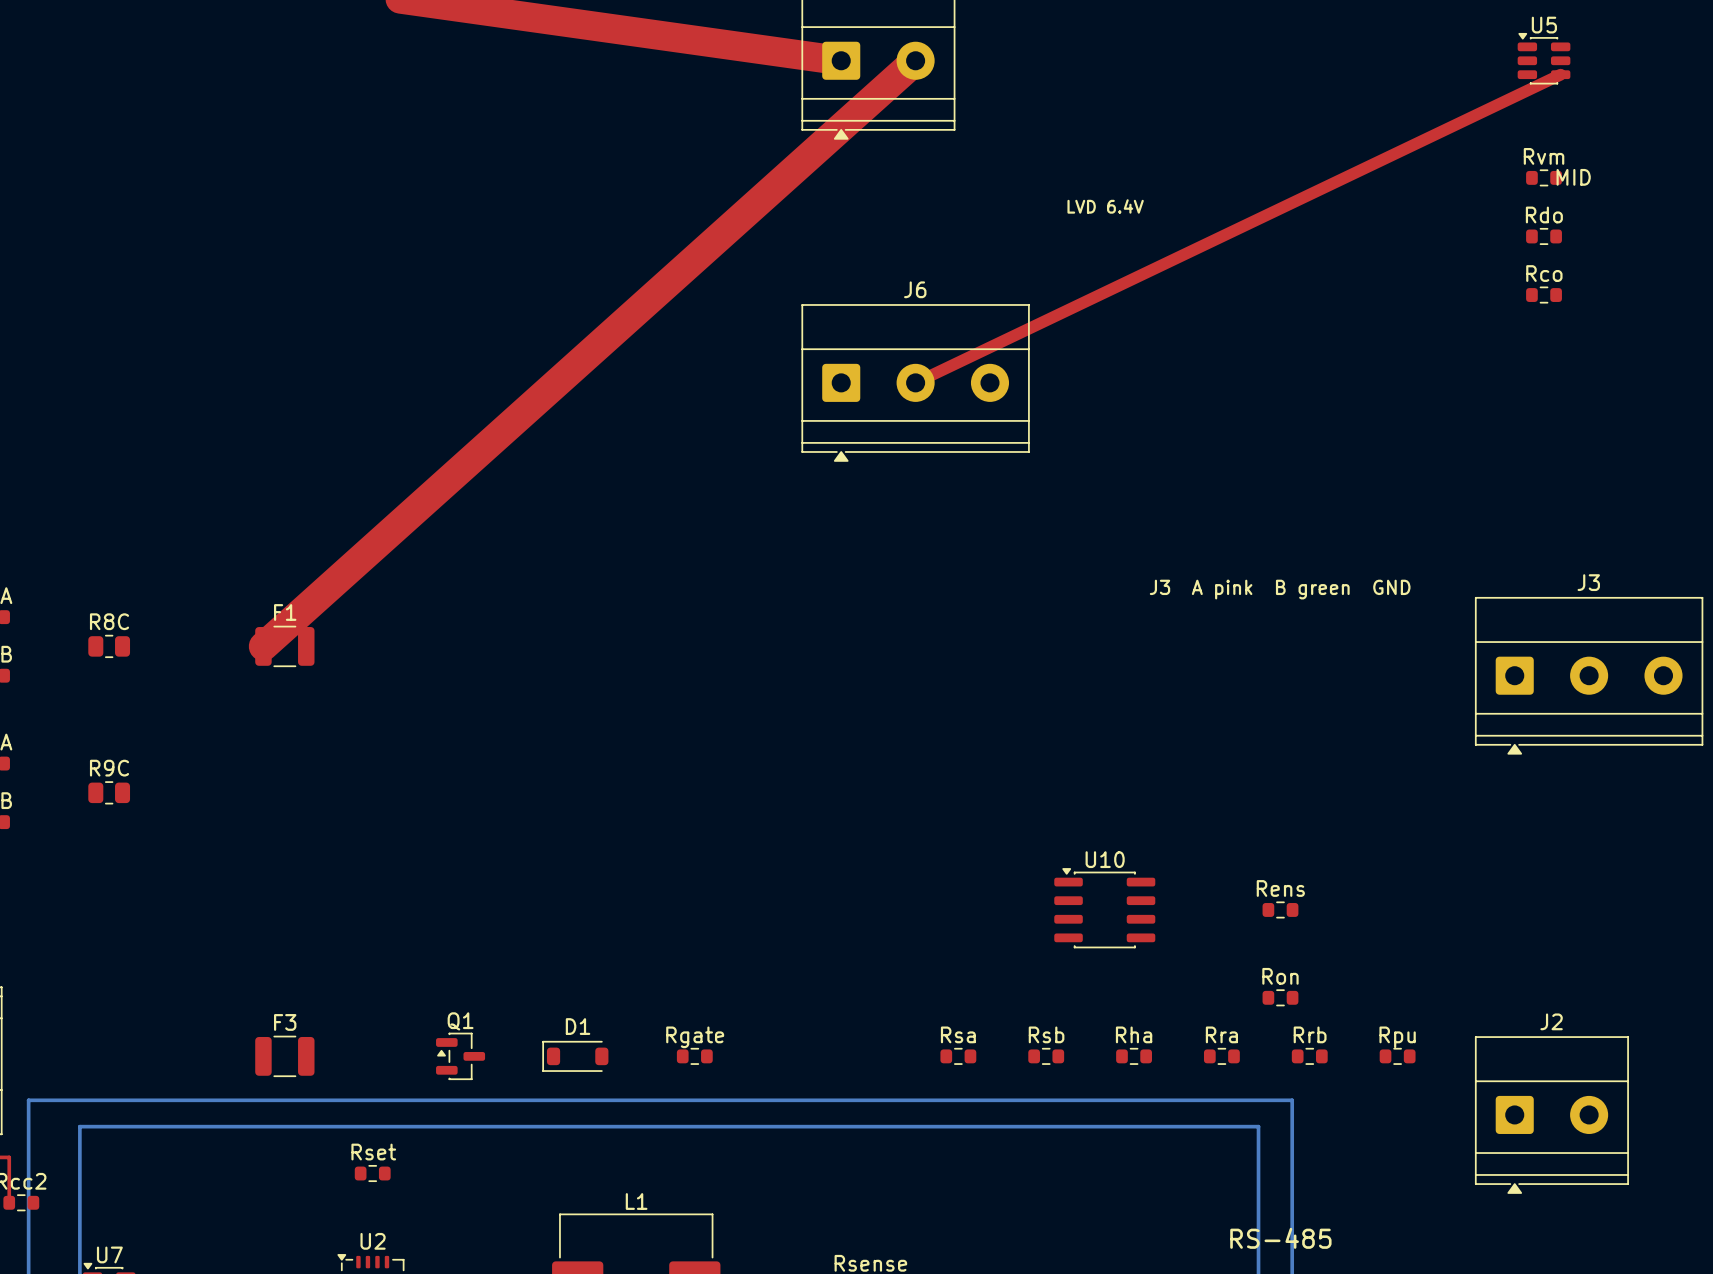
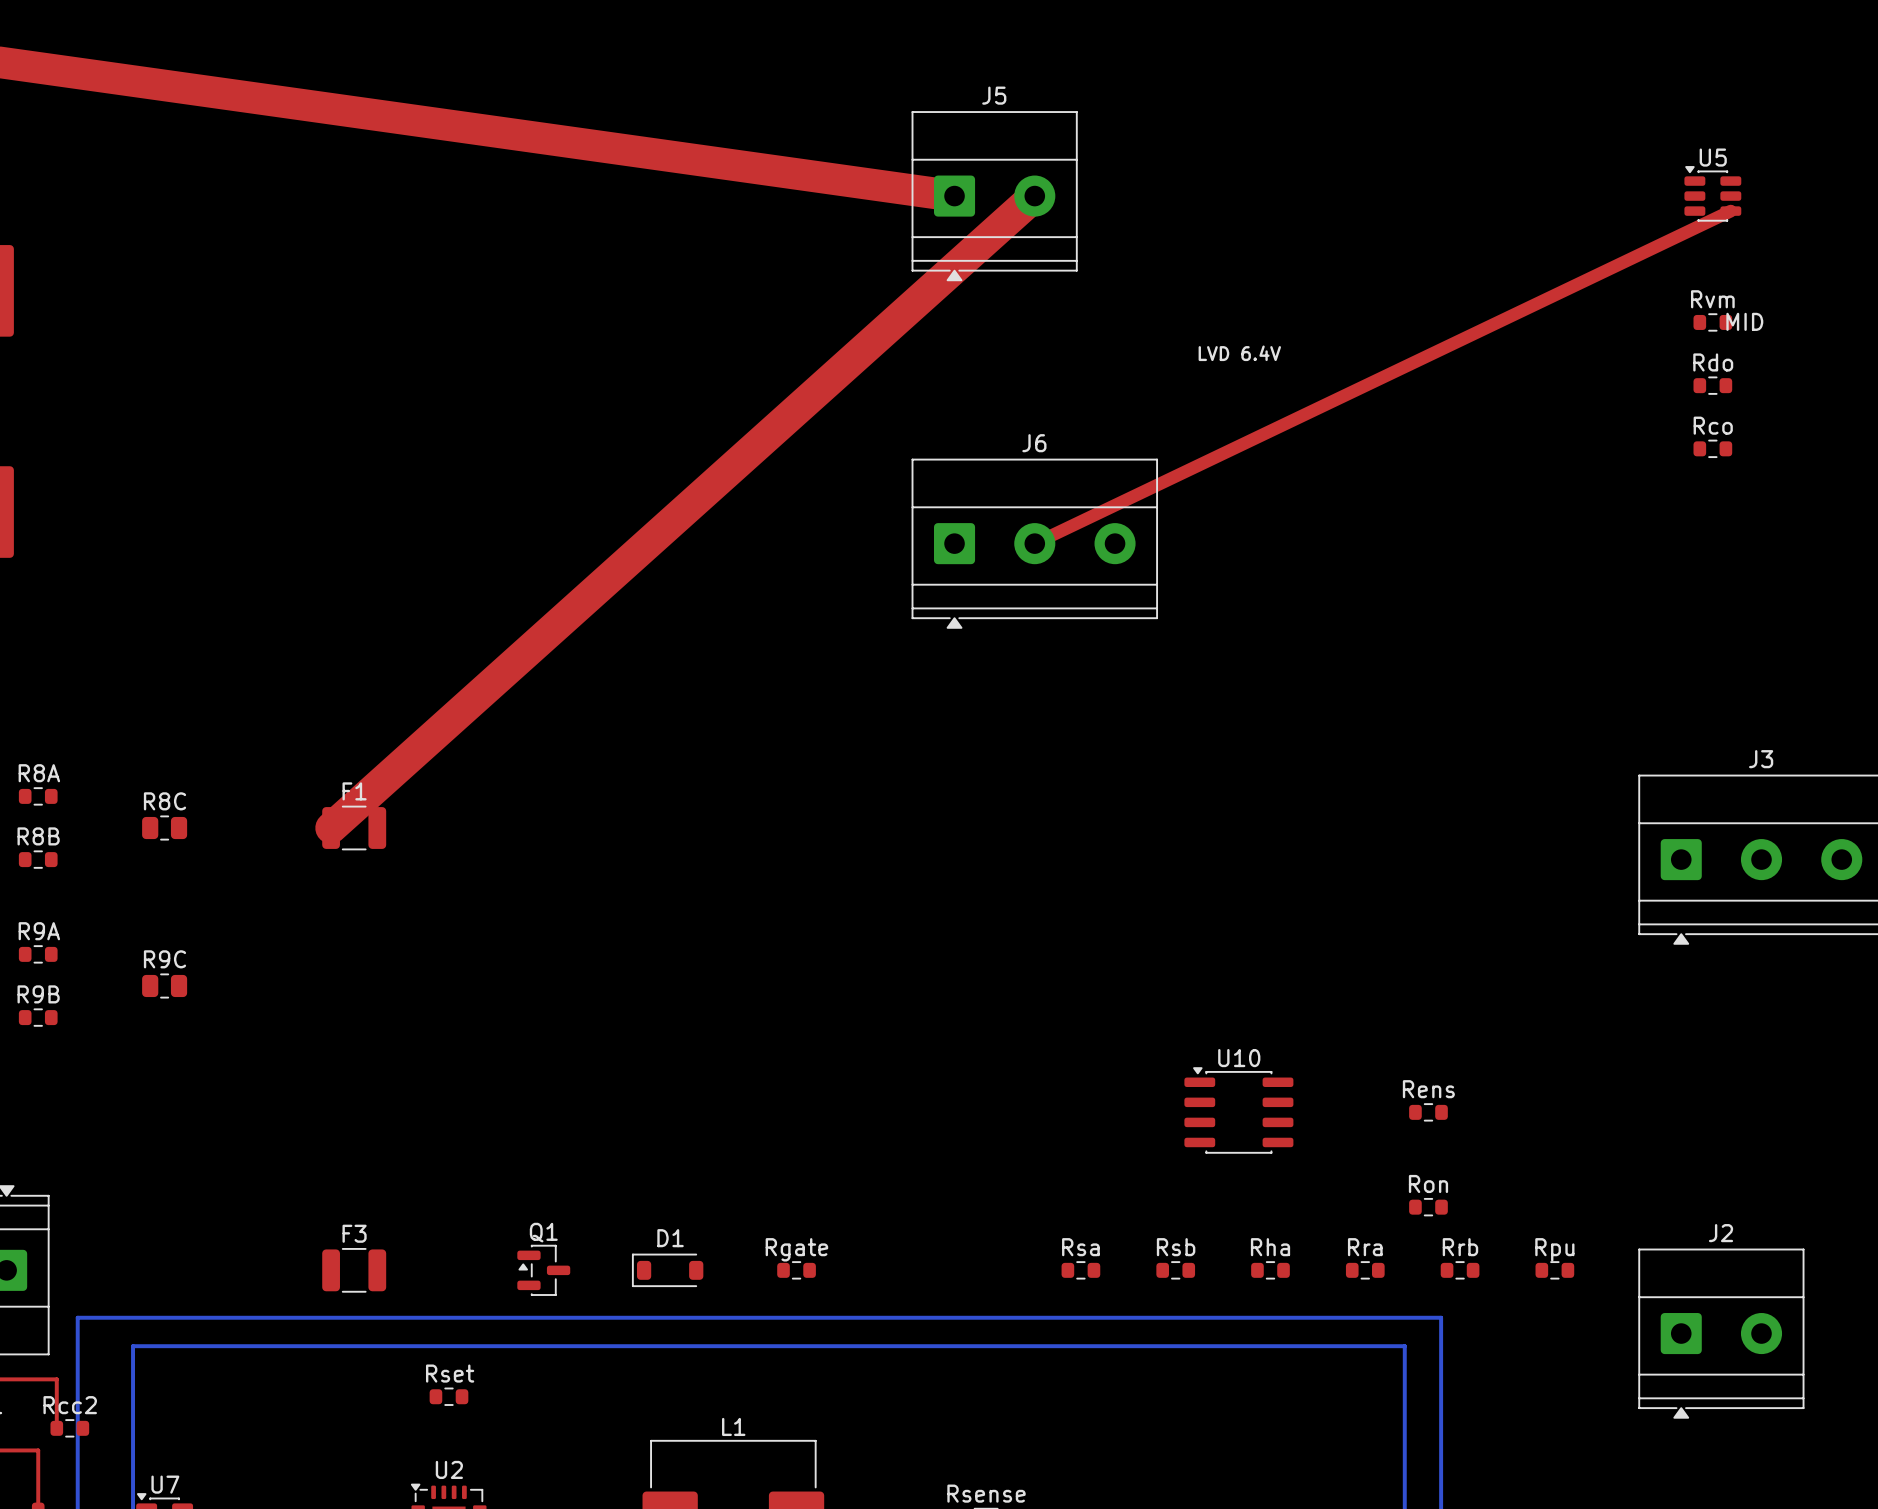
text: J3 A pink B green GND (1280, 589) -> none
text: RS-485 (1280, 1238) -> none

